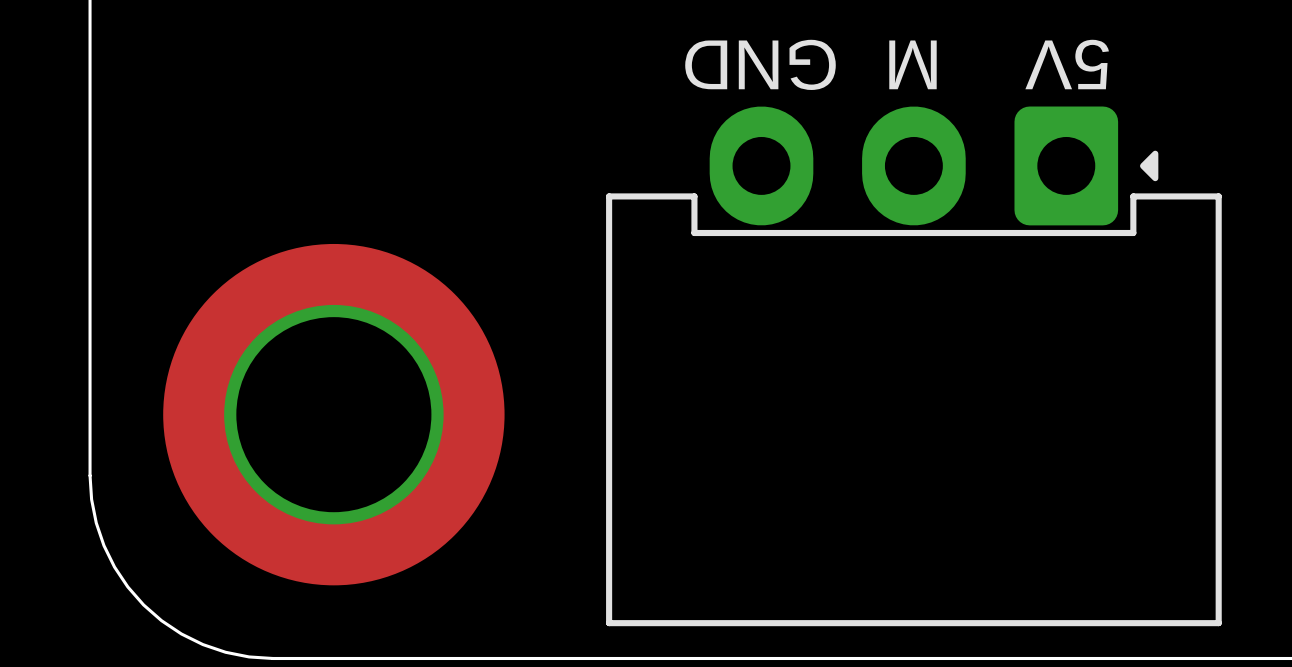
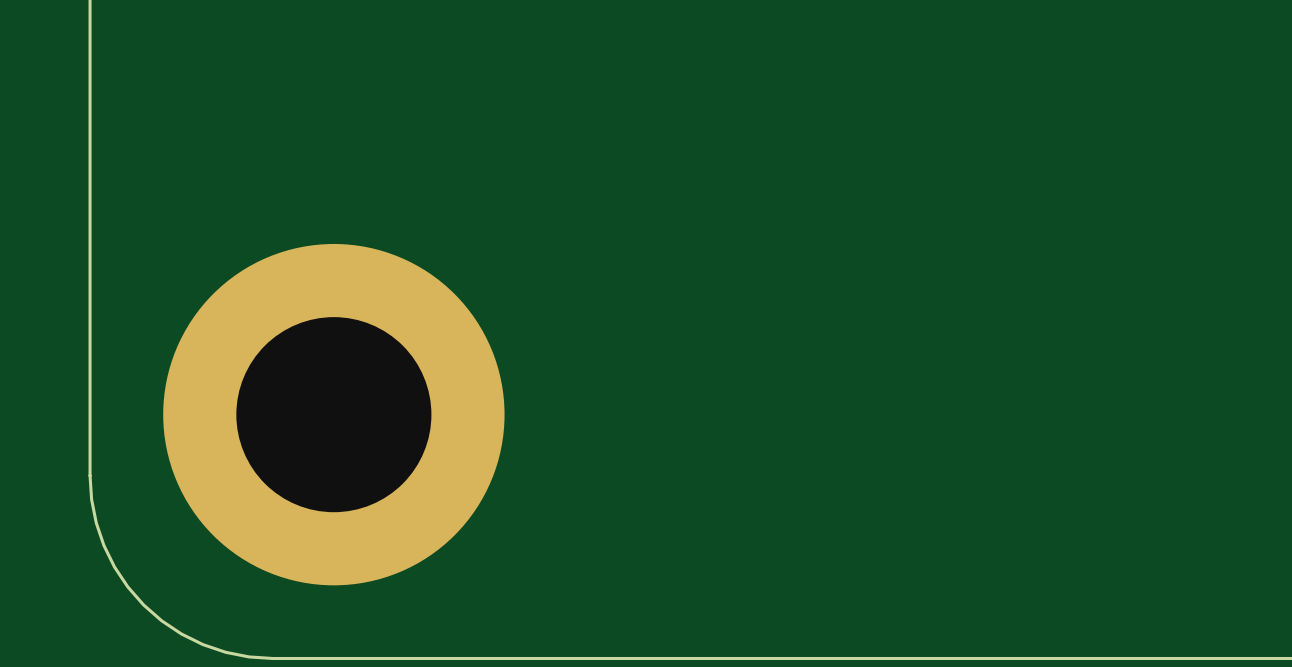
text: GND (760, 64) -> none
text: M (912, 64) -> none
text: 5V (1067, 64) -> none
part: (913, 366) -> none

